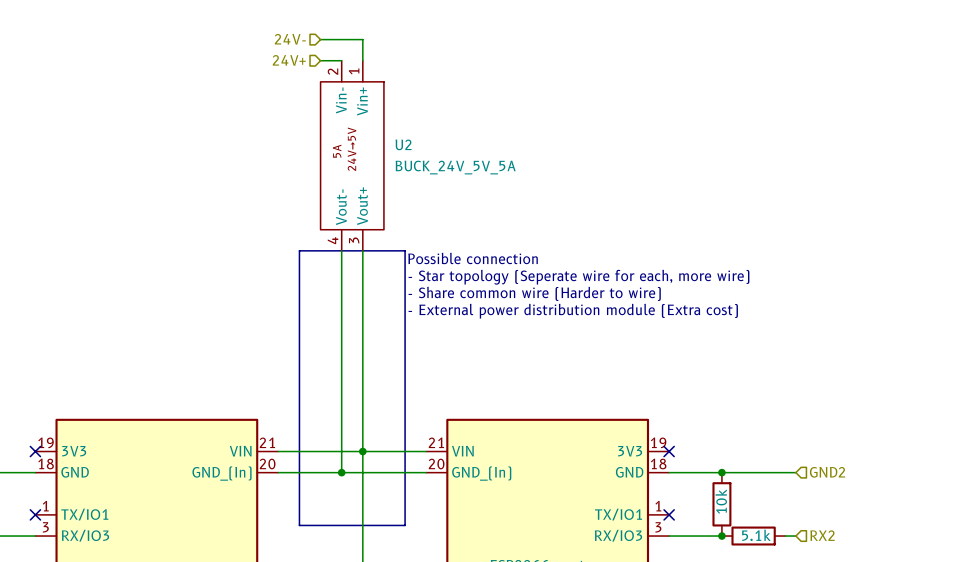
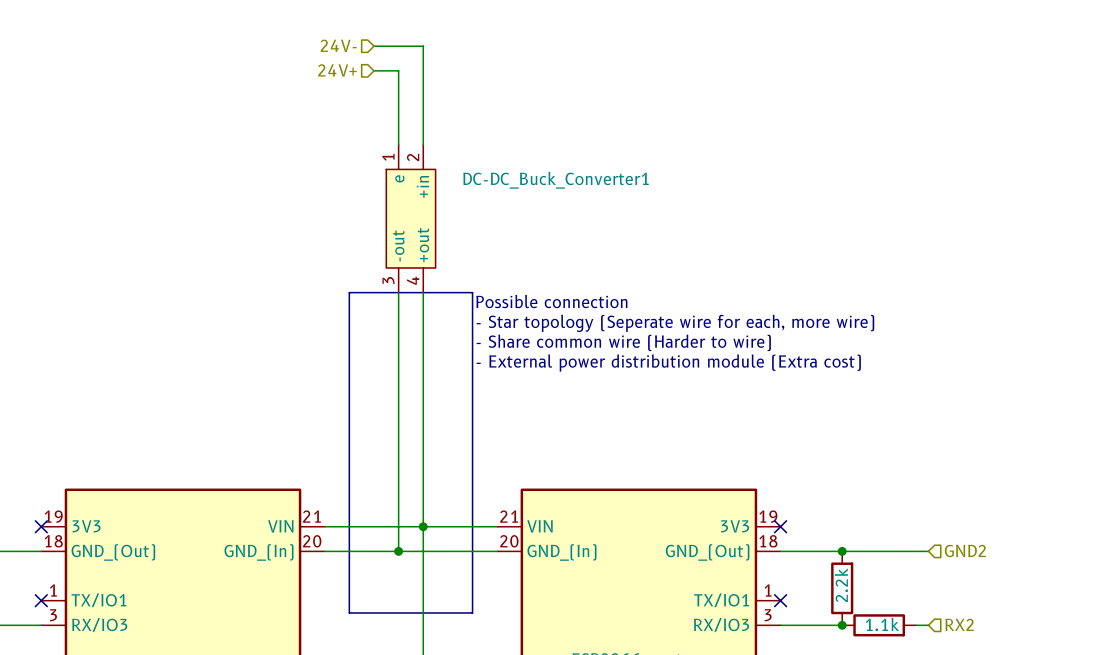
wire: none -> (398, 70) (398, 144)
wire: none -> (423, 70) (423, 144)
U2: BUCK_24V_5V_5A (352, 155) -> none
DC-DC_Buck_Converter1: none -> (410, 218)
part pin name: GND (75, 472) -> GND_(Out) (113, 552)
part pin name: GND (629, 472) -> GND_(Out) (707, 552)
part value: 10k (721, 501) -> 2.2k (841, 585)
part value: 5.1k (756, 535) -> 1.1k (882, 624)

